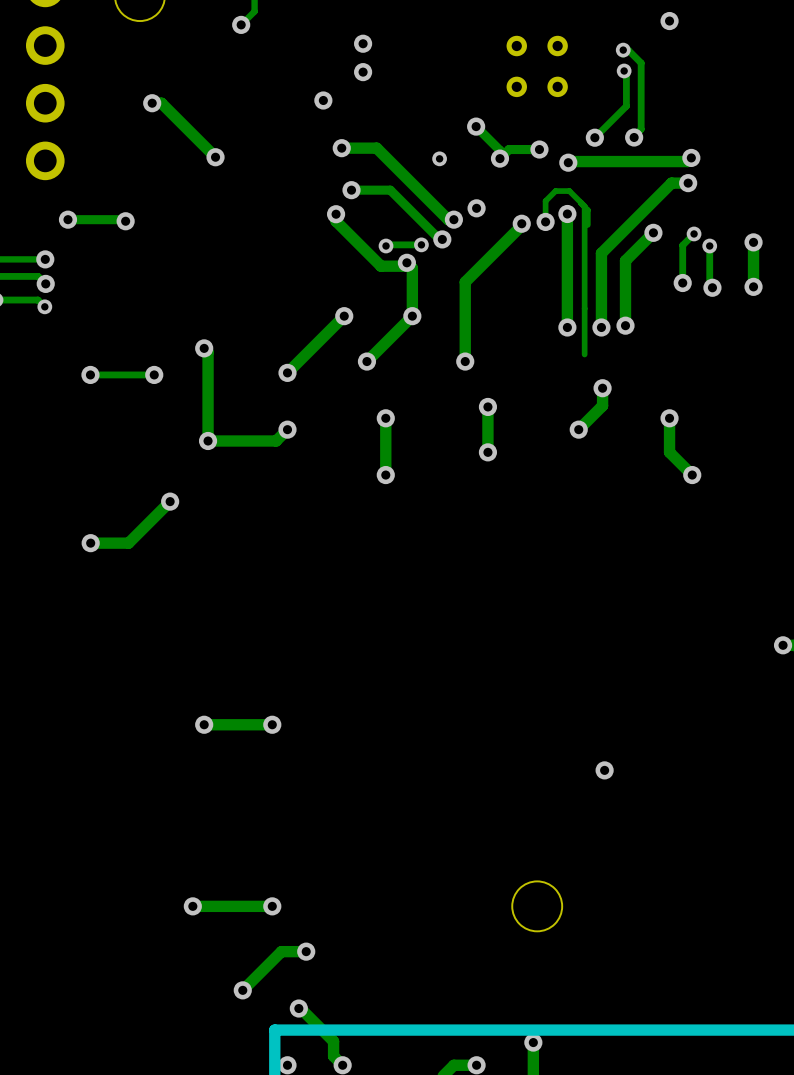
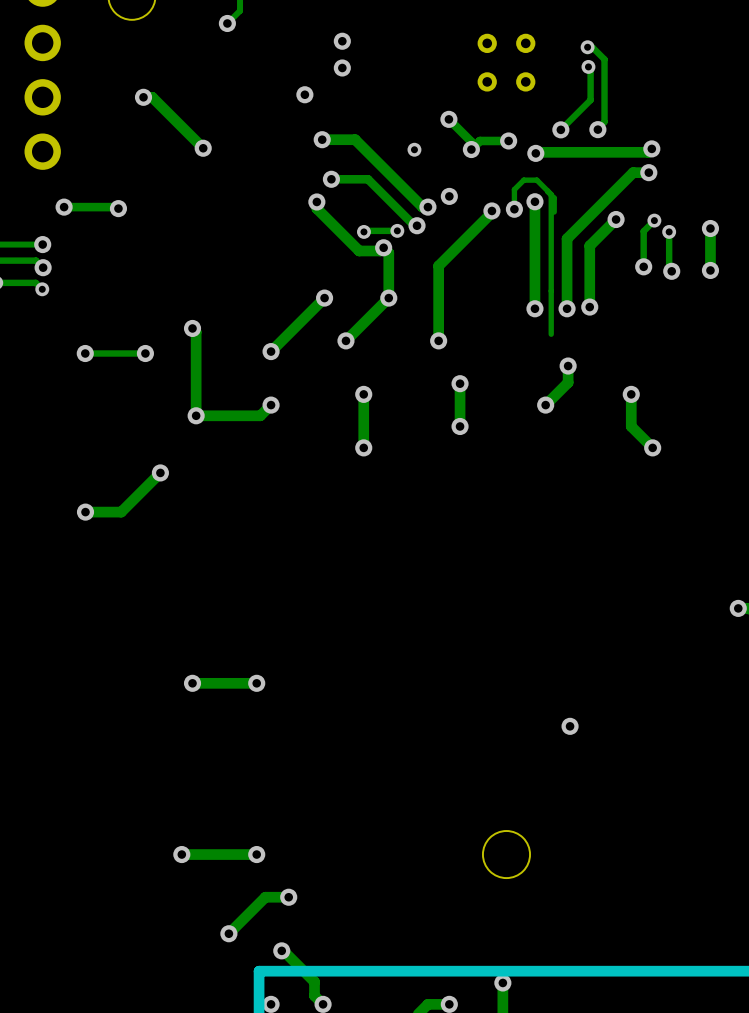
via: (669, 21) -> none

